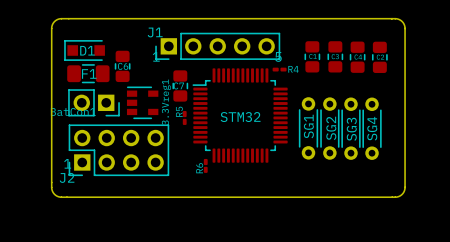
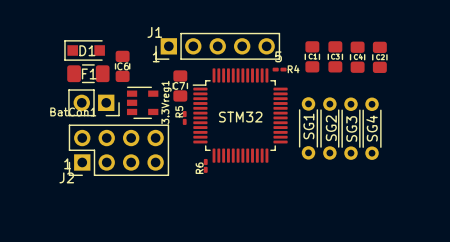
board edge: (61, 18) (400, 20) (405, 28) (403, 192) (395, 197) (56, 195) (51, 187) (51, 28) (54, 21) (61, 18) -> none

